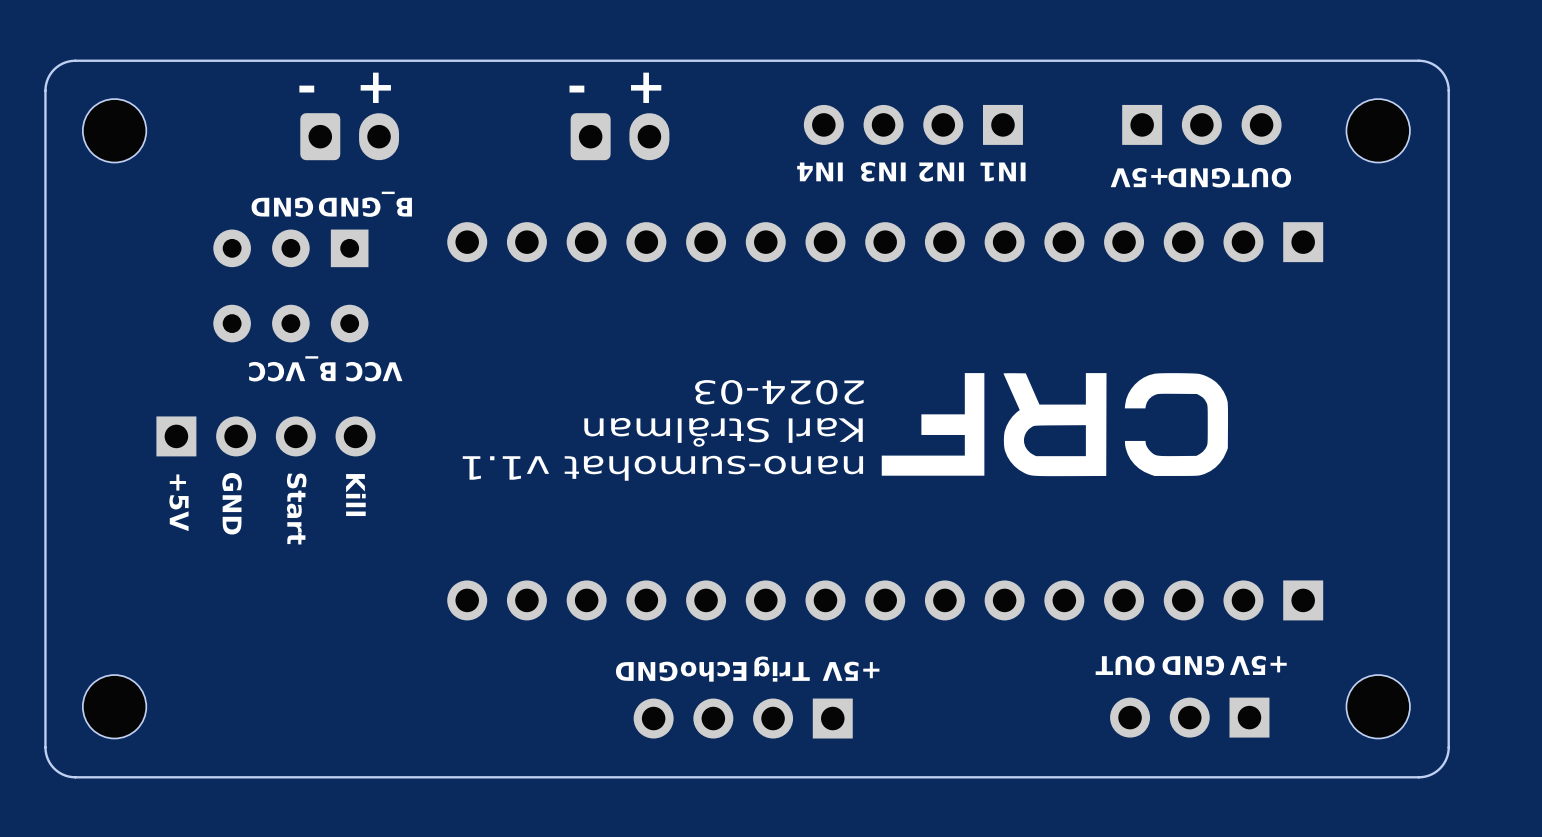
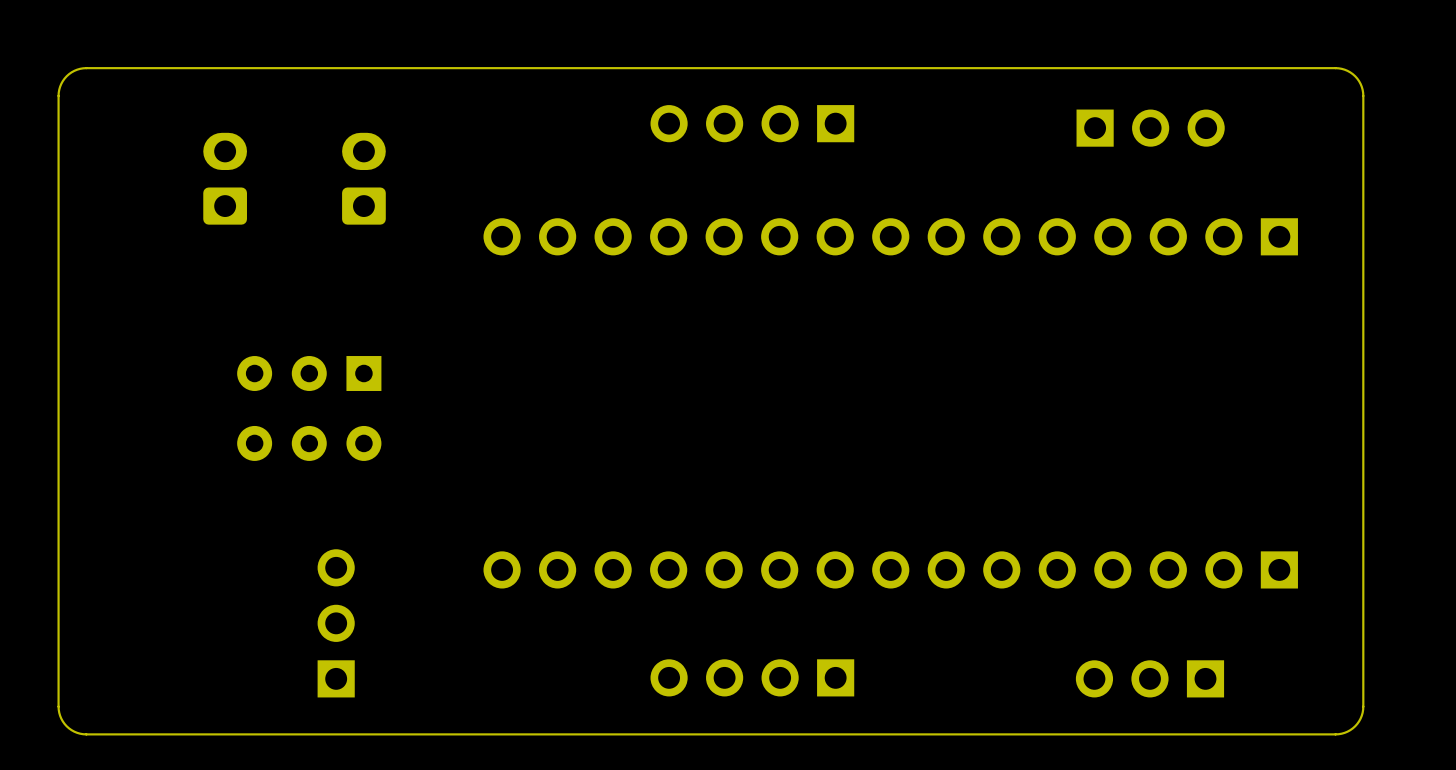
text: + (375, 87) -> none
text: + (646, 87) -> none
text: - (306, 89) -> none
text: - (576, 89) -> none
part position: (913, 124) -> (752, 123)
part position: (1201, 124) -> (1150, 128)
part: (114, 130) -> none
part: (1378, 130) -> none
part rotation: 0° (349, 136) -> 90° counterclockwise (363, 178)
part: (620, 136) -> none
text: IN4 (819, 171) -> none
text: IN3 (883, 171) -> none
text: IN1 (1003, 171) -> none
text: IN2 (941, 172) -> none
text: +5V (1139, 177) -> none
text: GND (1199, 177) -> none
text: OUT (1261, 177) -> none
part: none -> (225, 178)
text: B_GND (365, 204) -> none
text: GND (282, 207) -> none
part position: (885, 242) -> (890, 236)
part position: (290, 285) -> (309, 408)
text: B_VCC (292, 368) -> none
text: VCC (374, 371) -> none
drawing: [881, 373, 1229, 477] -> none
text: 2024-03 (779, 392) -> none
text: Karl Strålman (723, 432) -> none
part: (265, 436) -> none
text: nano-sumohat v1.1 (662, 468) -> none
text: Kill (355, 495) -> none
text: +5V (178, 502) -> none
text: GND (232, 503) -> none
text: Start (296, 509) -> none
part position: (885, 600) -> (890, 569)
part: none -> (336, 623)
text: OUT (1125, 665) -> none
text: GND (1193, 665) -> none
text: +5V (1258, 665) -> none
text: Trig (782, 669) -> none
text: GND (646, 671) -> none
text: Echo (713, 671) -> none
text: +5V (851, 671) -> none
part: (114, 706) -> none
part: (1378, 706) -> none
part position: (1189, 717) -> (1149, 678)
part position: (743, 718) -> (752, 677)

